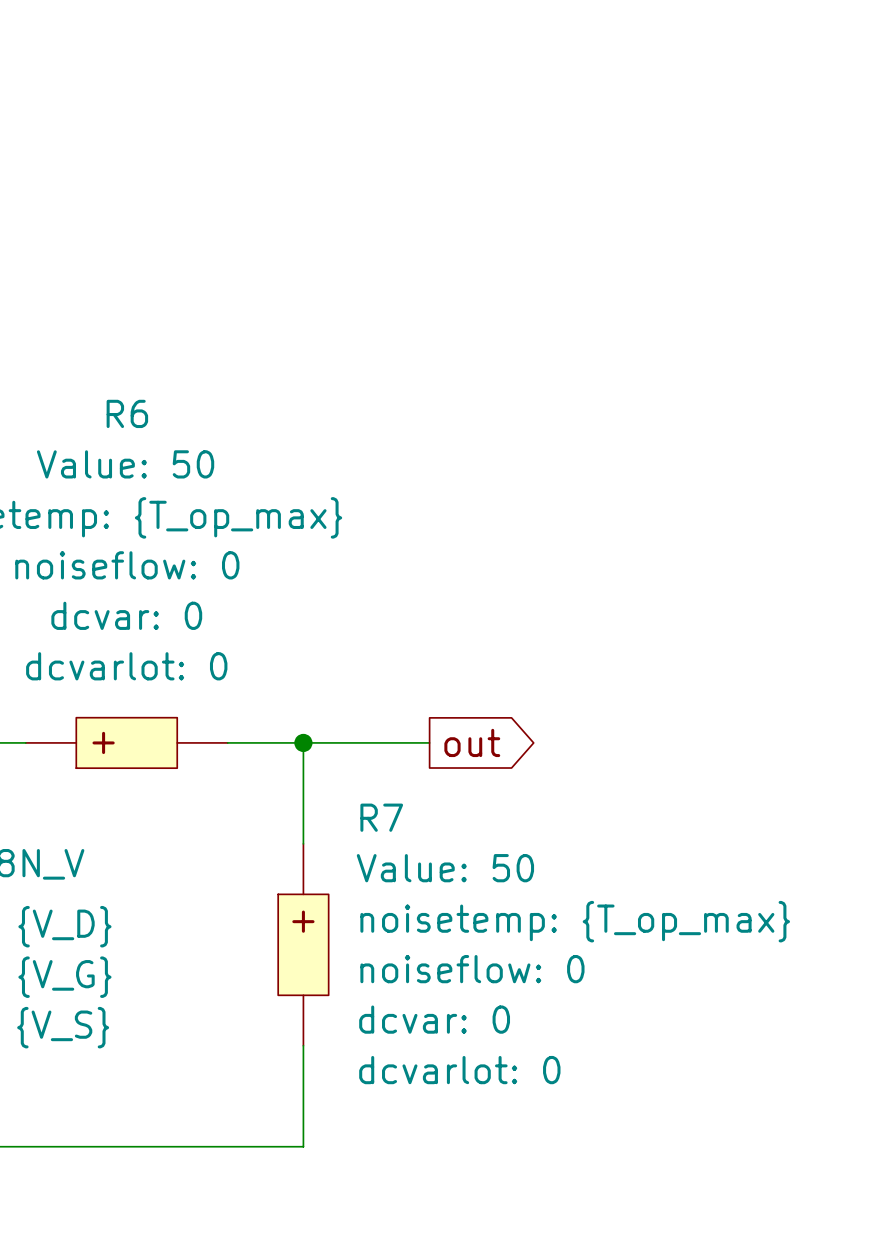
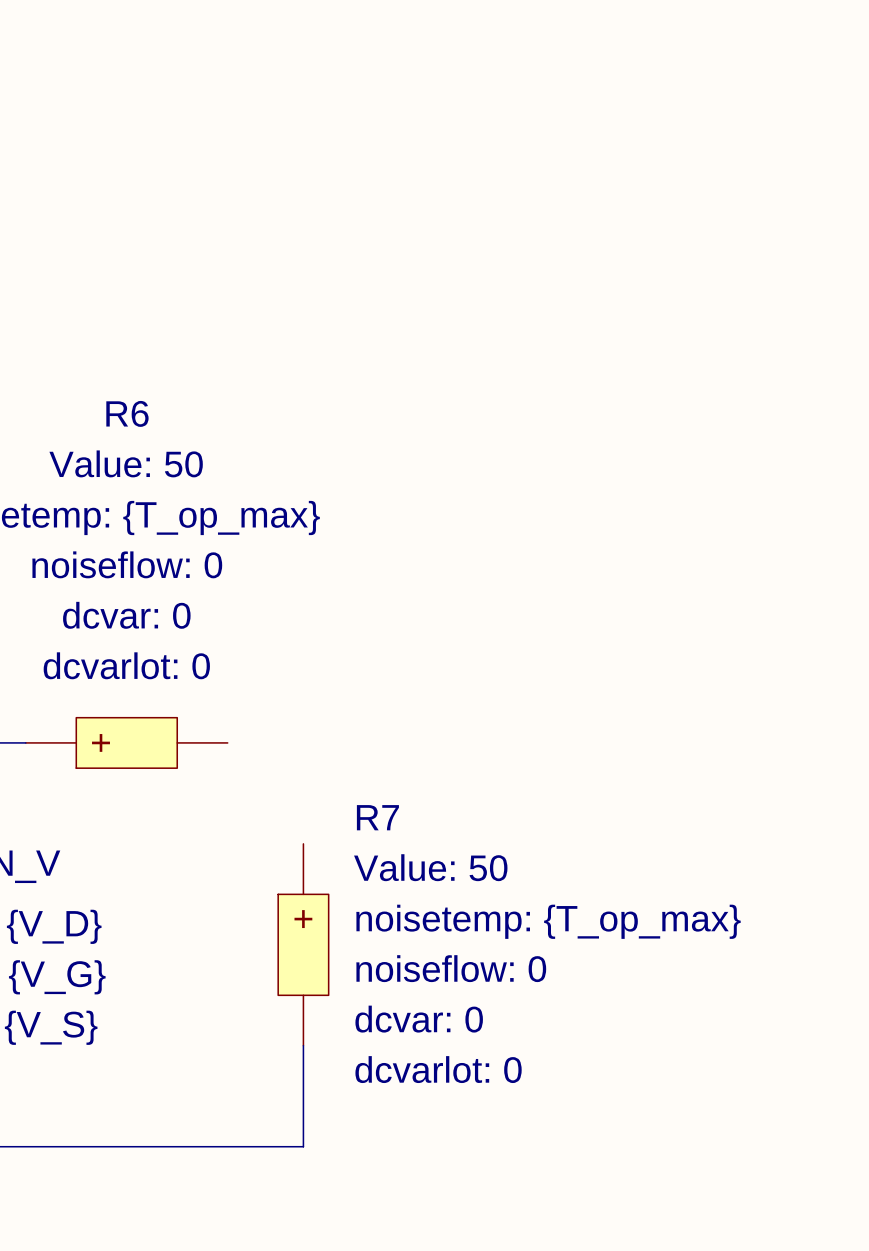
wire: (227, 742) (429, 742) -> none
wire: (303, 742) (303, 843) -> none
junction: (303, 742) -> none
global label: out (472, 742) -> none

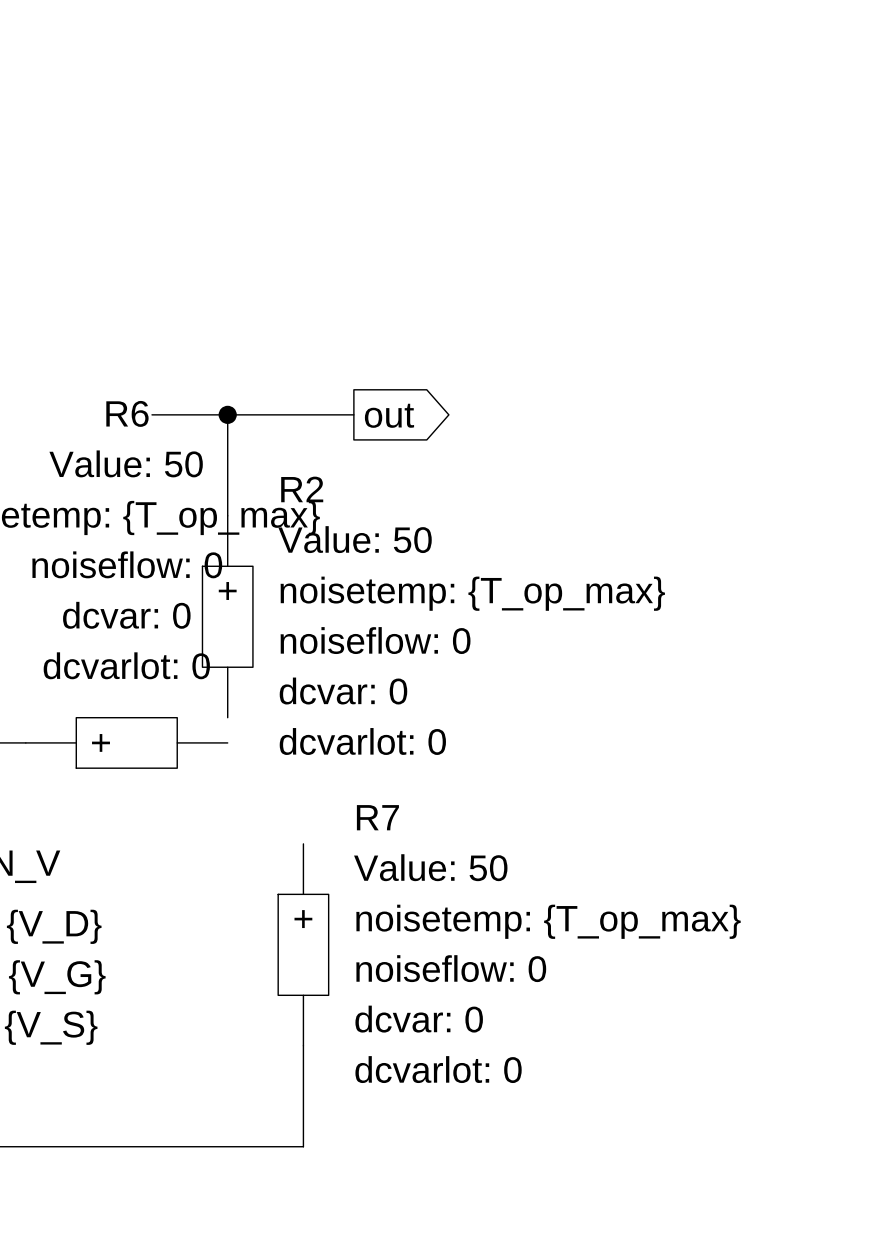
wire: none -> (152, 414) (353, 414)
wire: none -> (227, 414) (227, 515)
junction: none -> (227, 414)
global label: none -> out (389, 415)
R2: none -> Value: 50 (227, 616)

